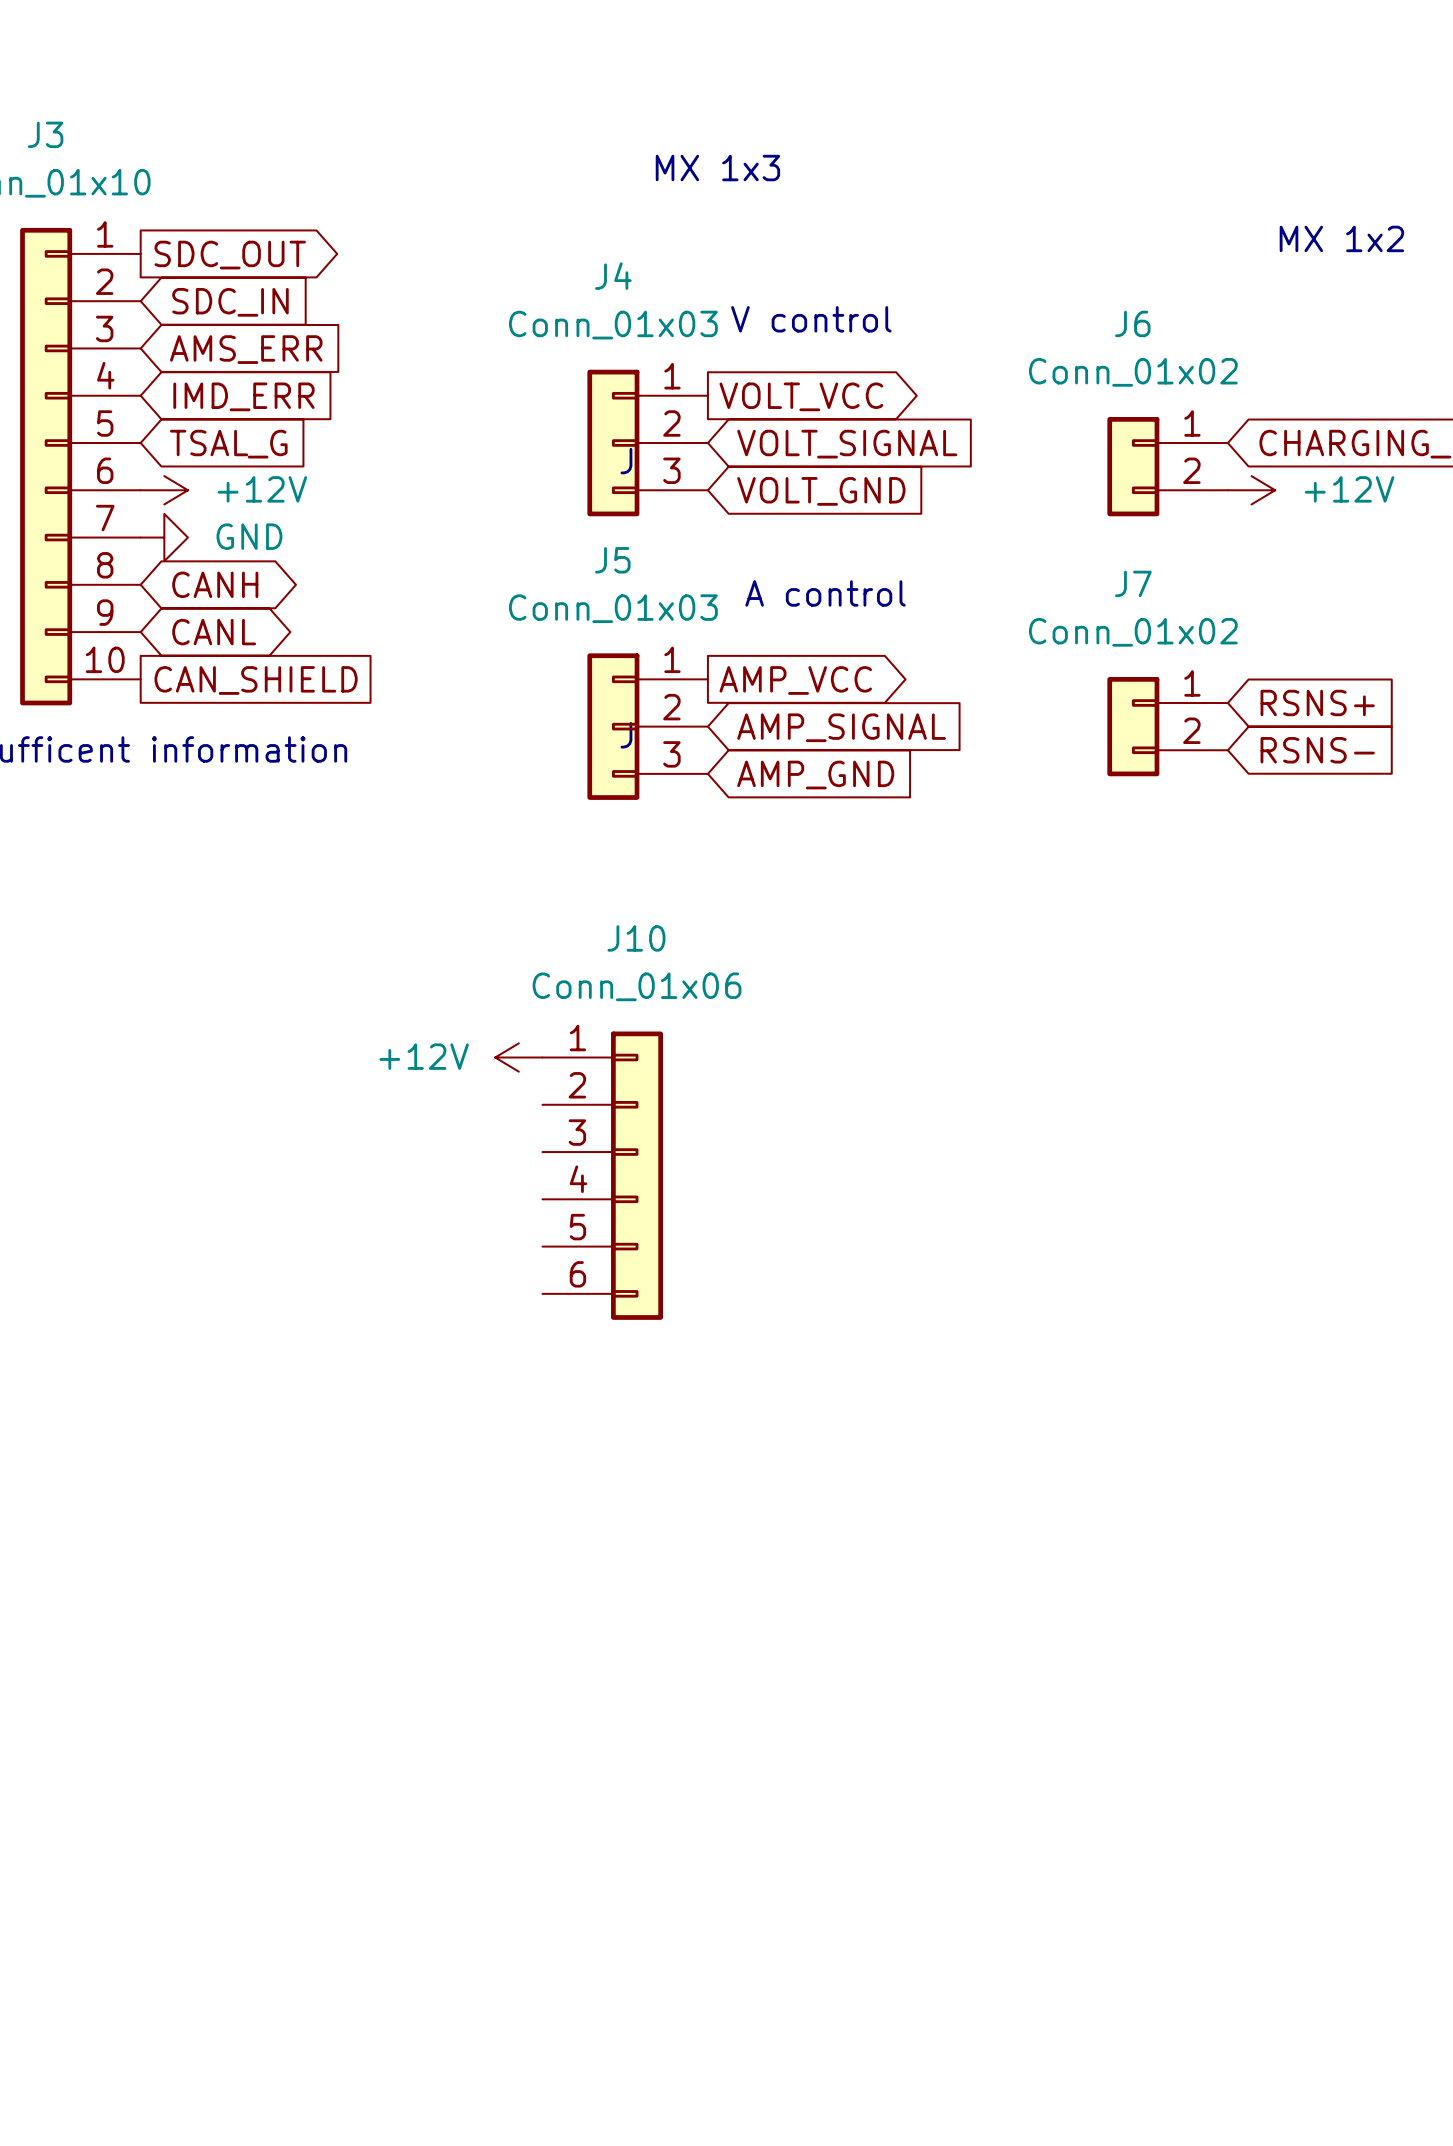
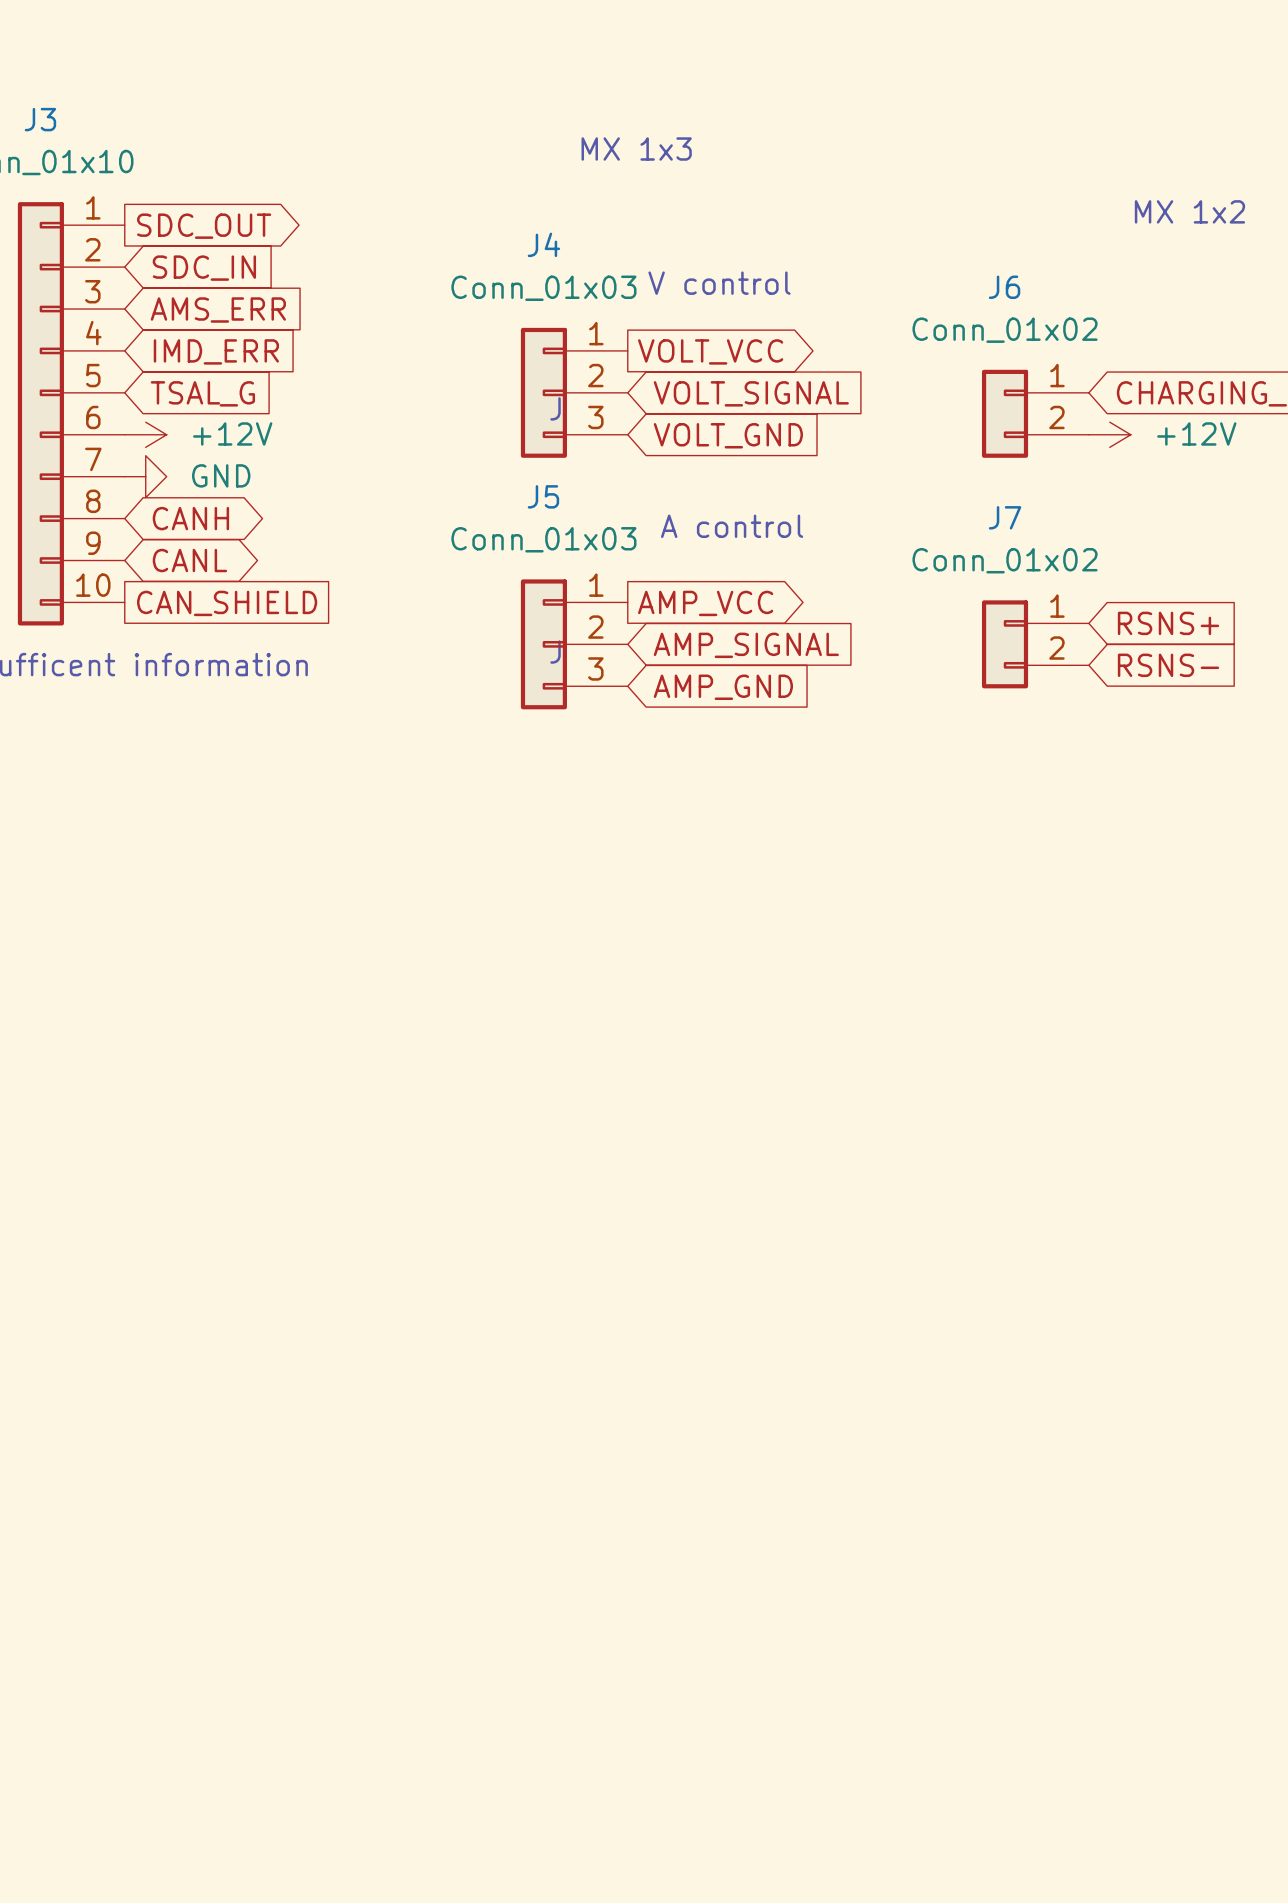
power symbol: +12V (518, 1057) -> none
J10: Conn_01x06 (602, 1175) -> none

